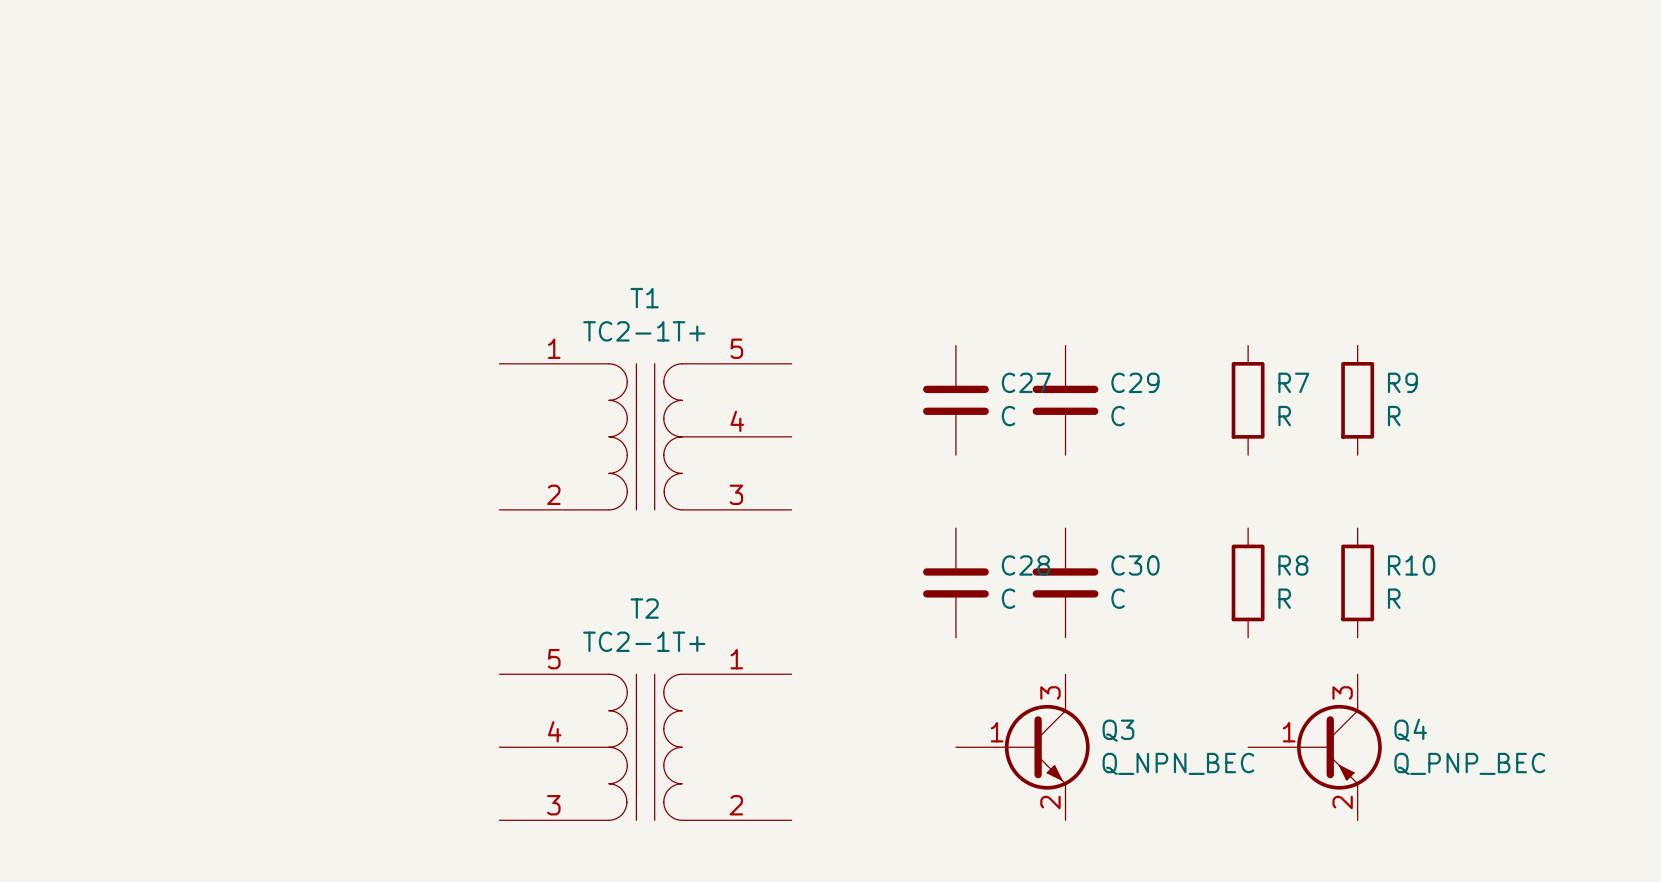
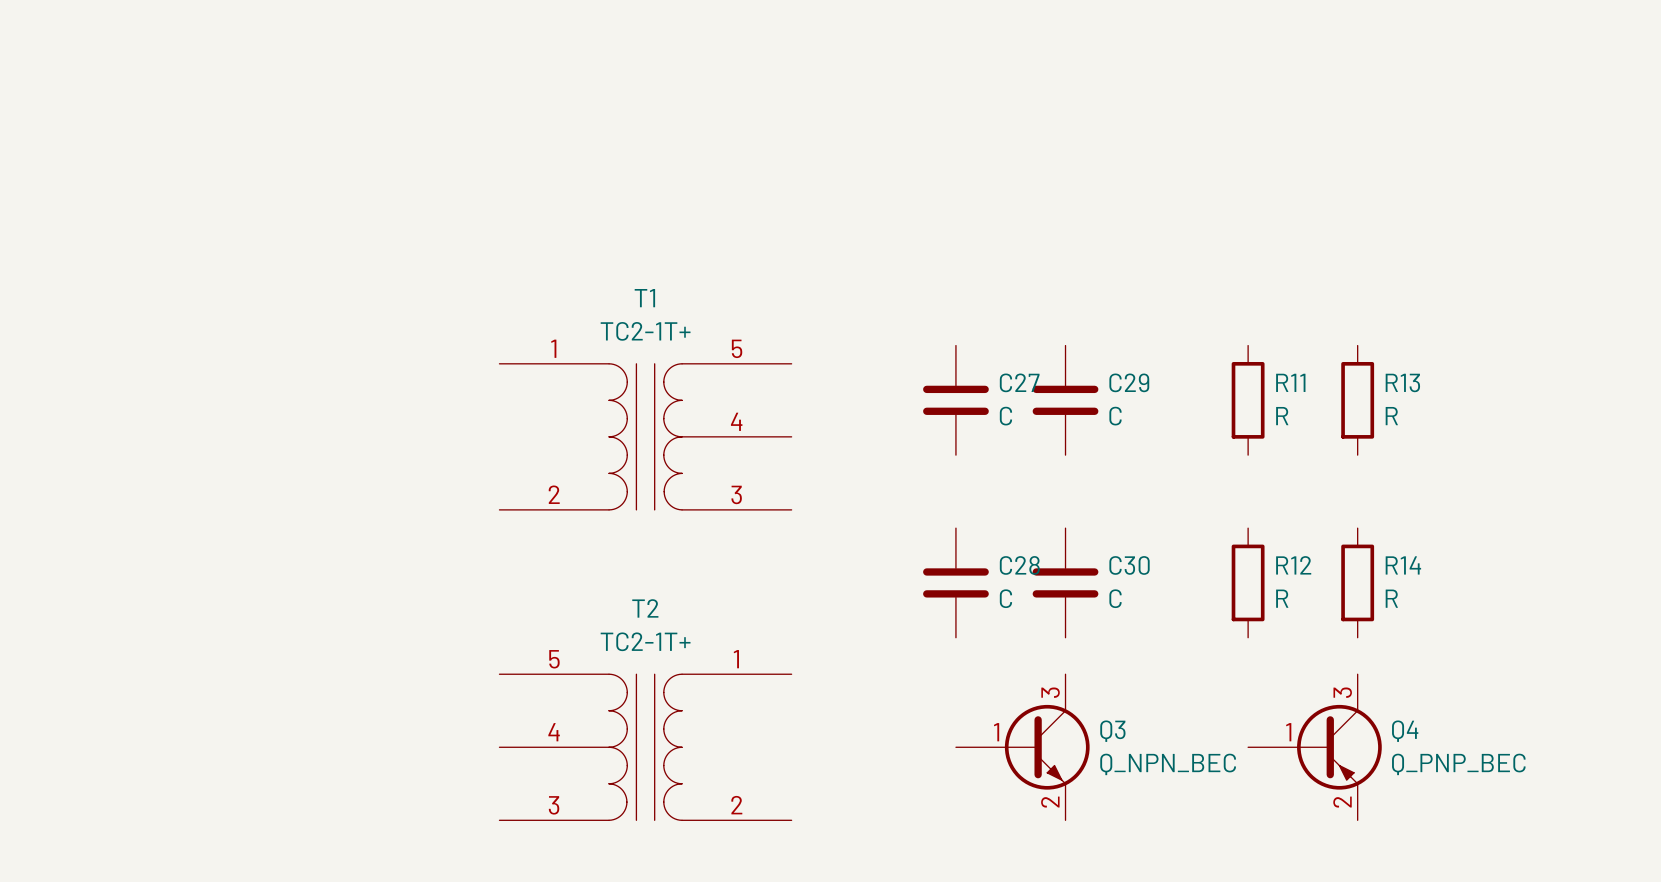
R7 name: R7 (1293, 382) -> R11 (1290, 382)
R9 name: R9 (1402, 382) -> R13 (1402, 382)
R8 name: R8 (1293, 565) -> R12 (1293, 565)
R10 name: R10 (1411, 565) -> R14 (1403, 565)

